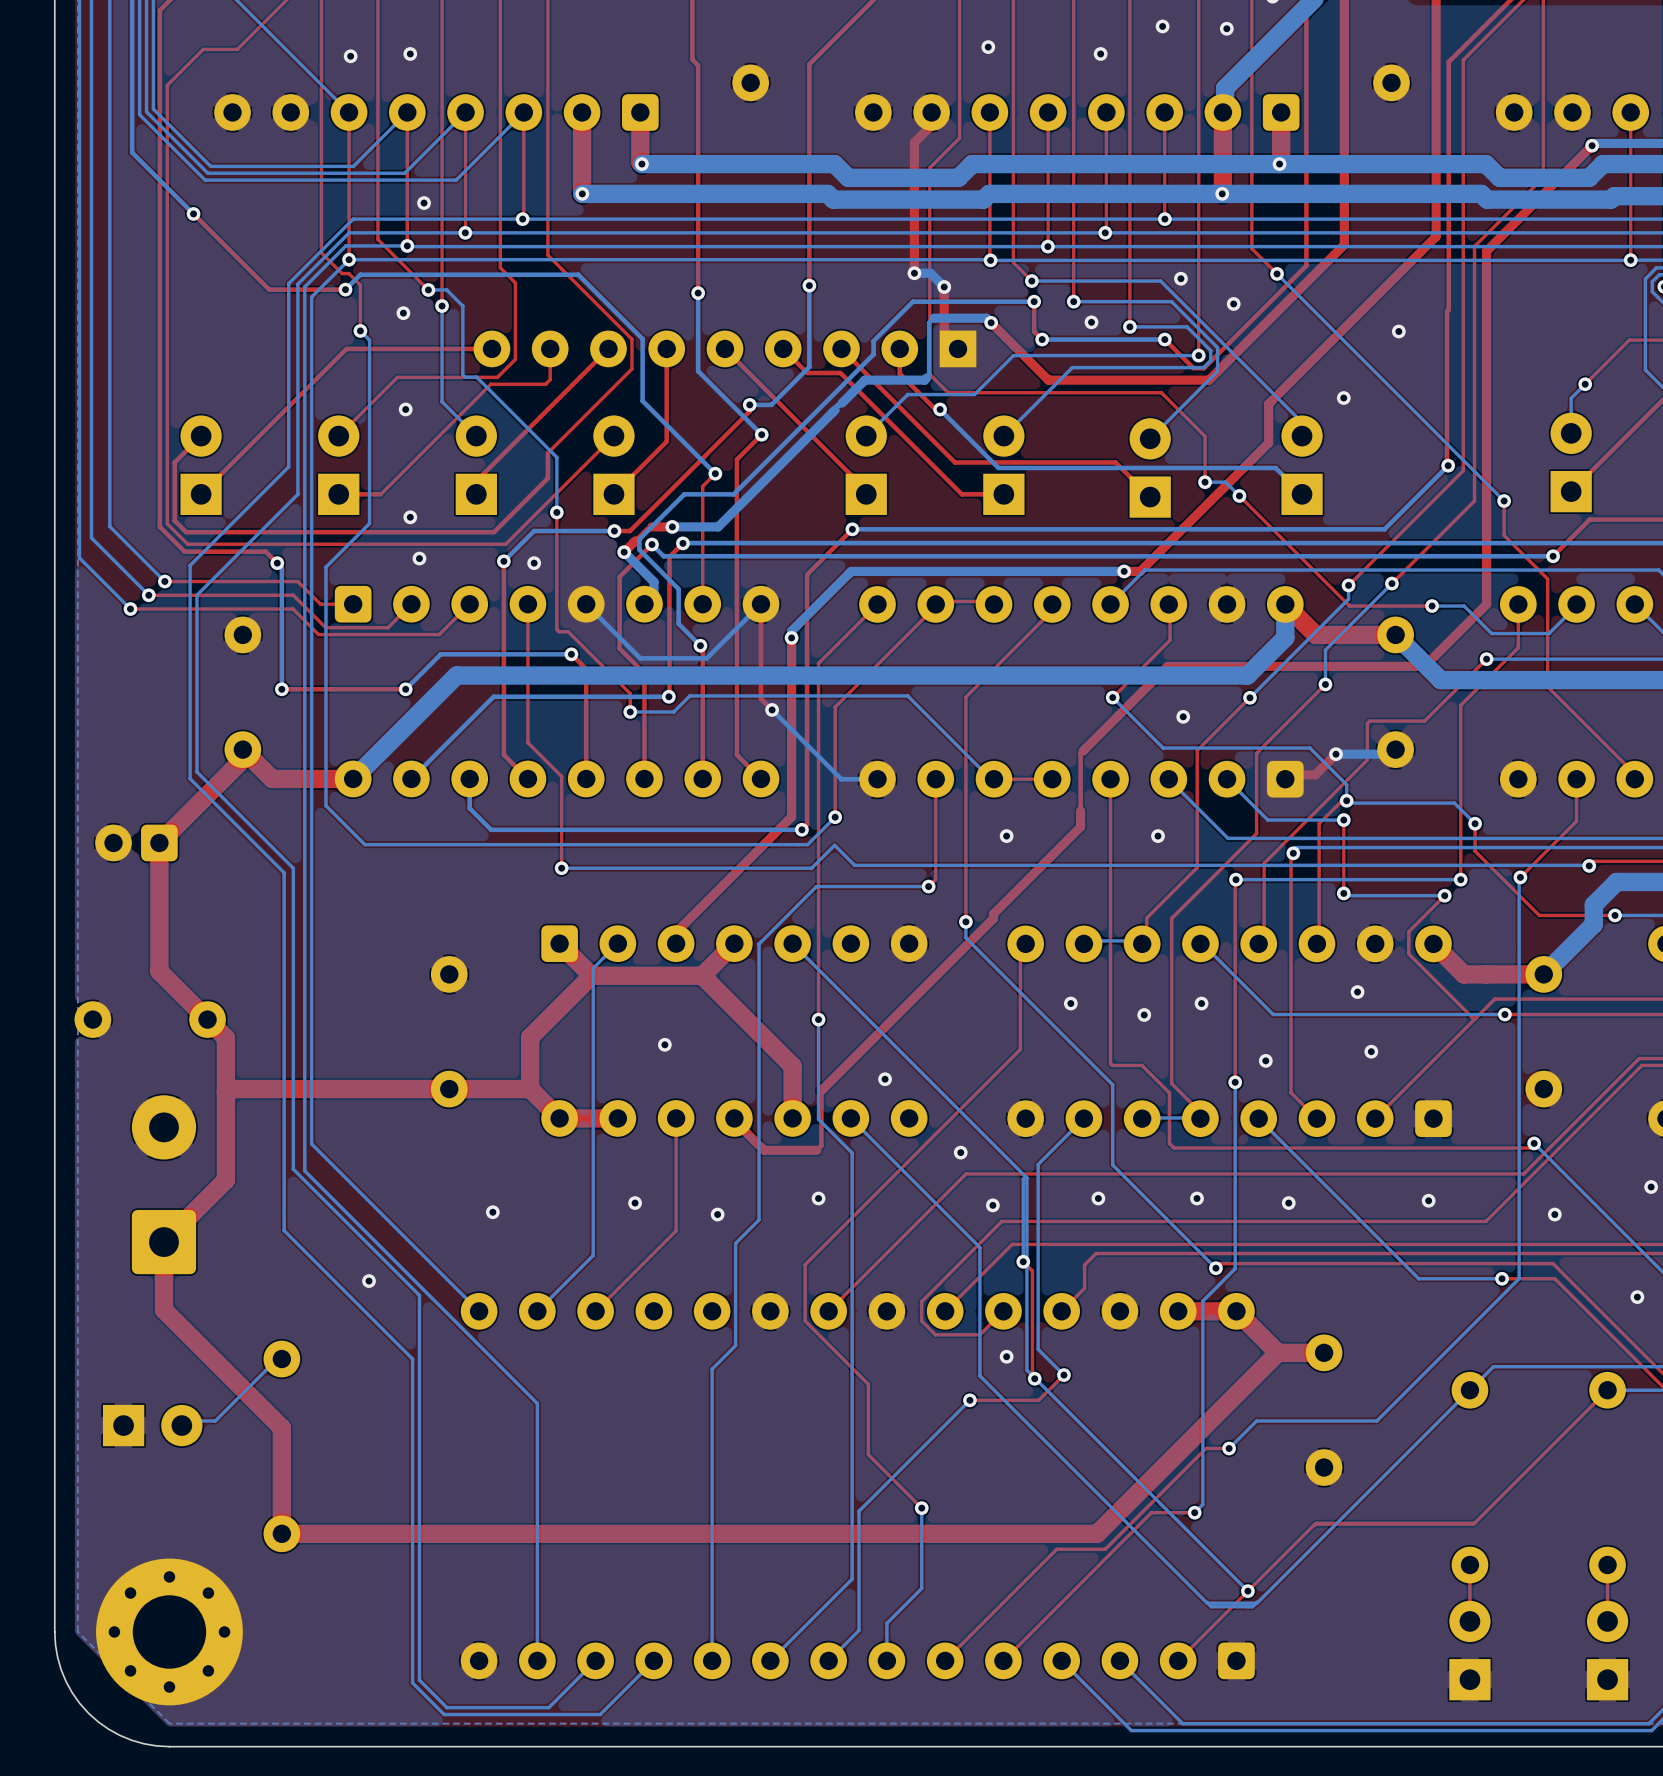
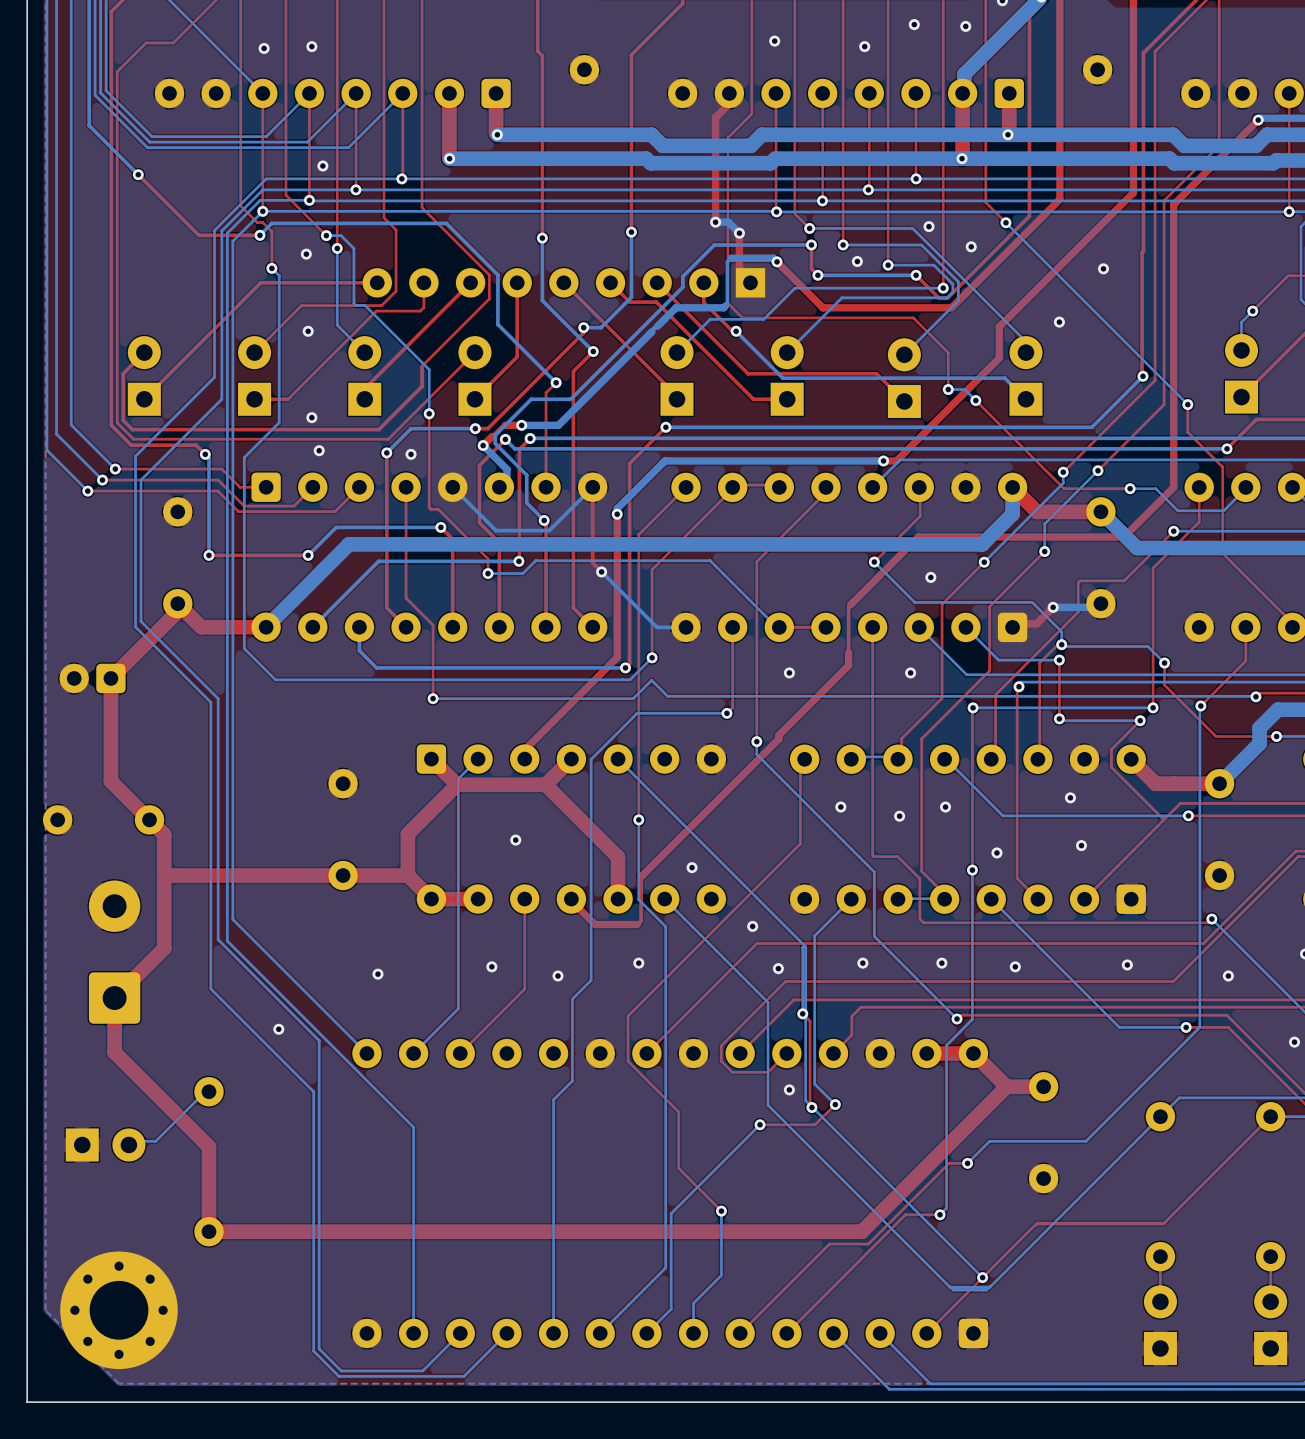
board edge: (54, 1631) (57, 1657) (66, 1681) (88, 1713) (108, 1729) (131, 1740) (169, 1746) -> (27, 1310) (27, 1402) (119, 1402)

